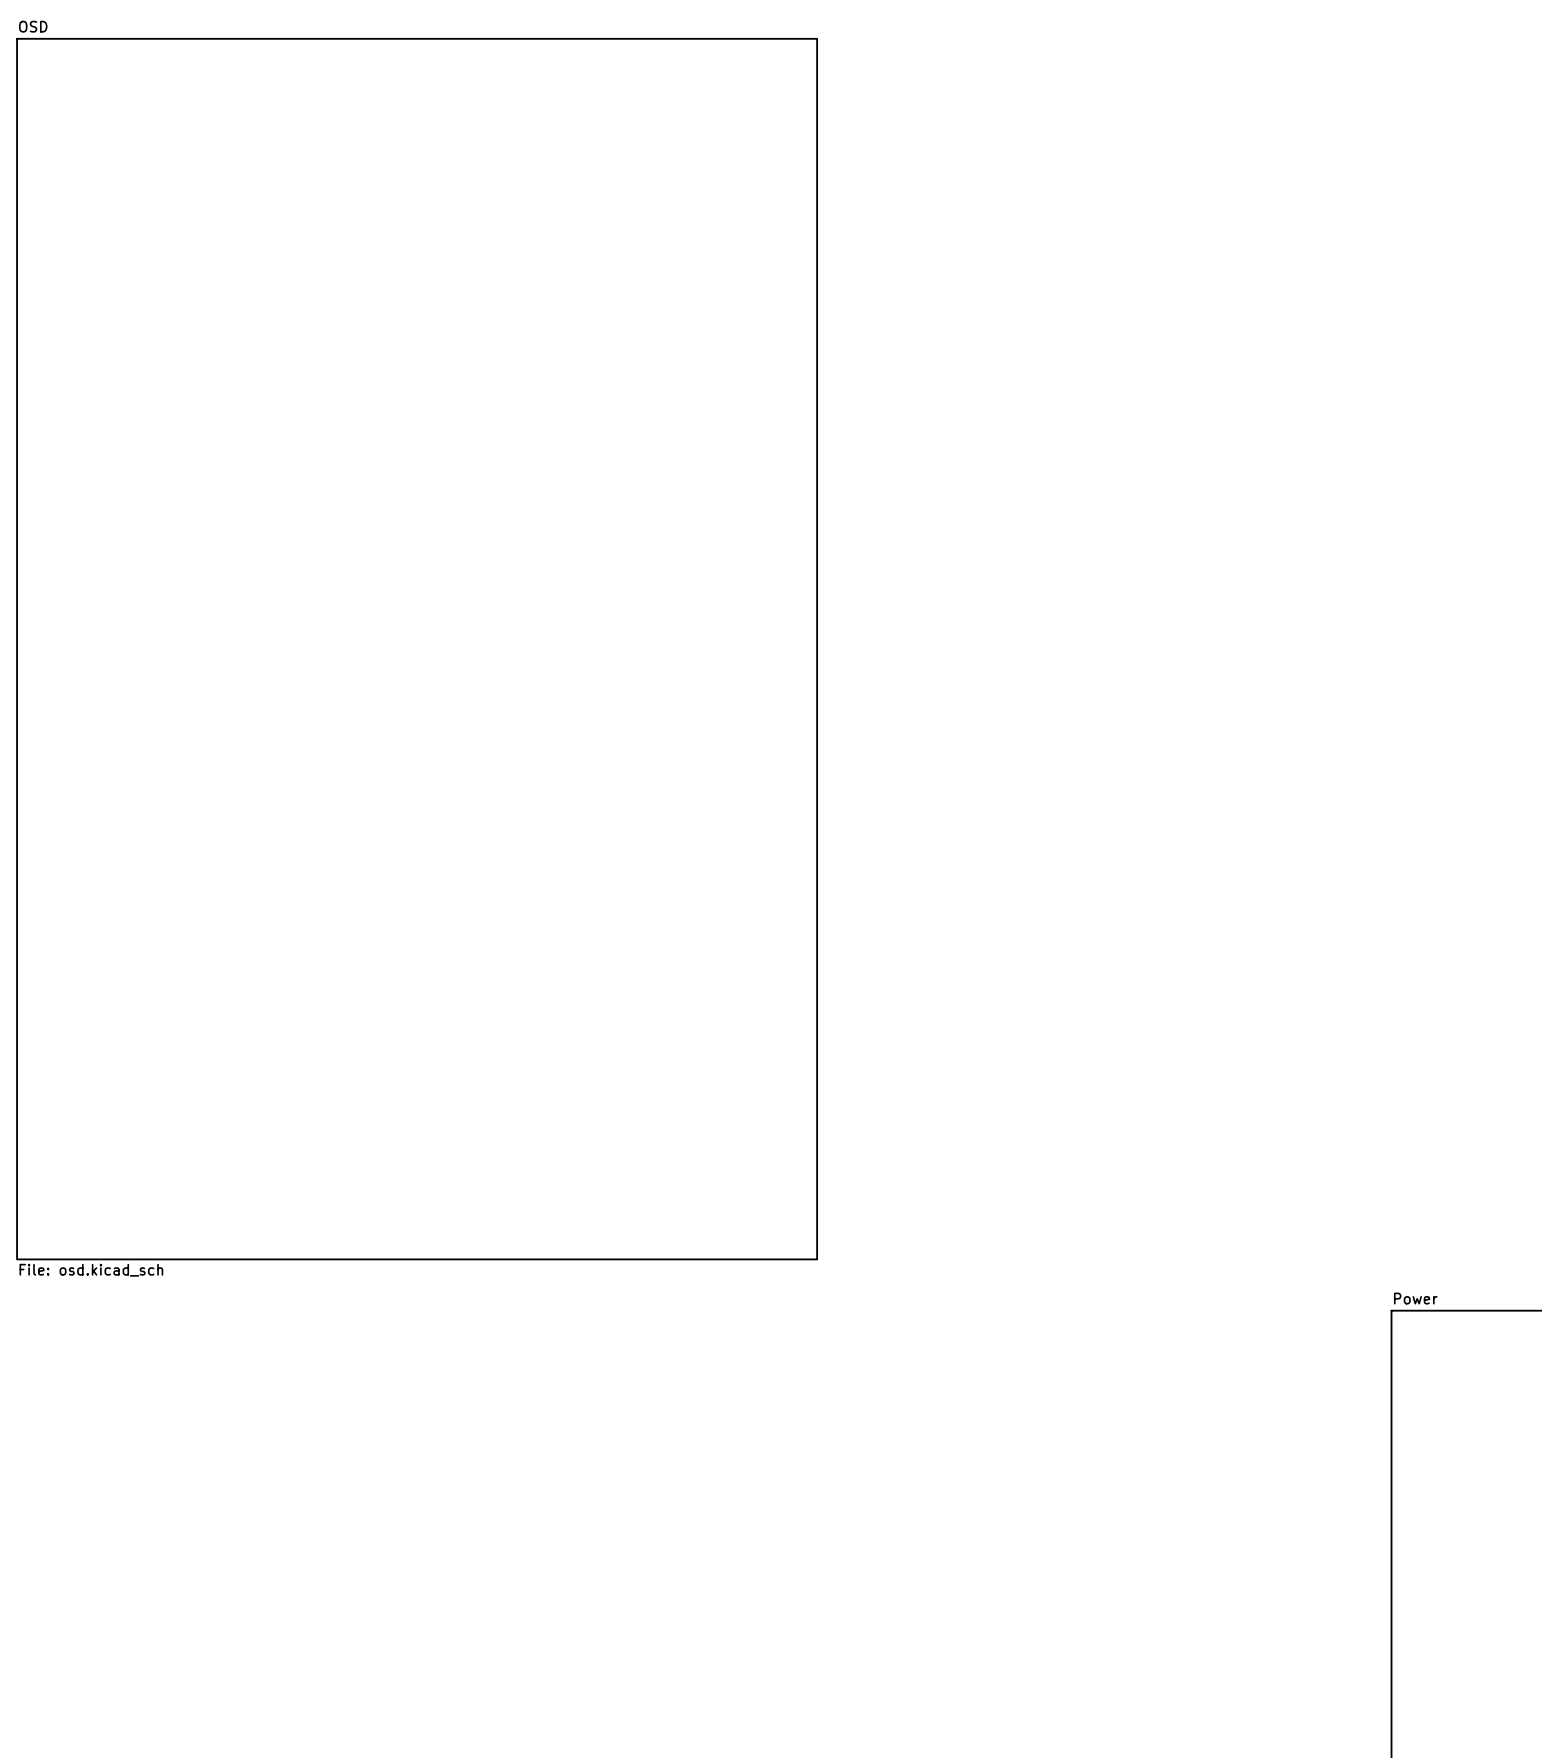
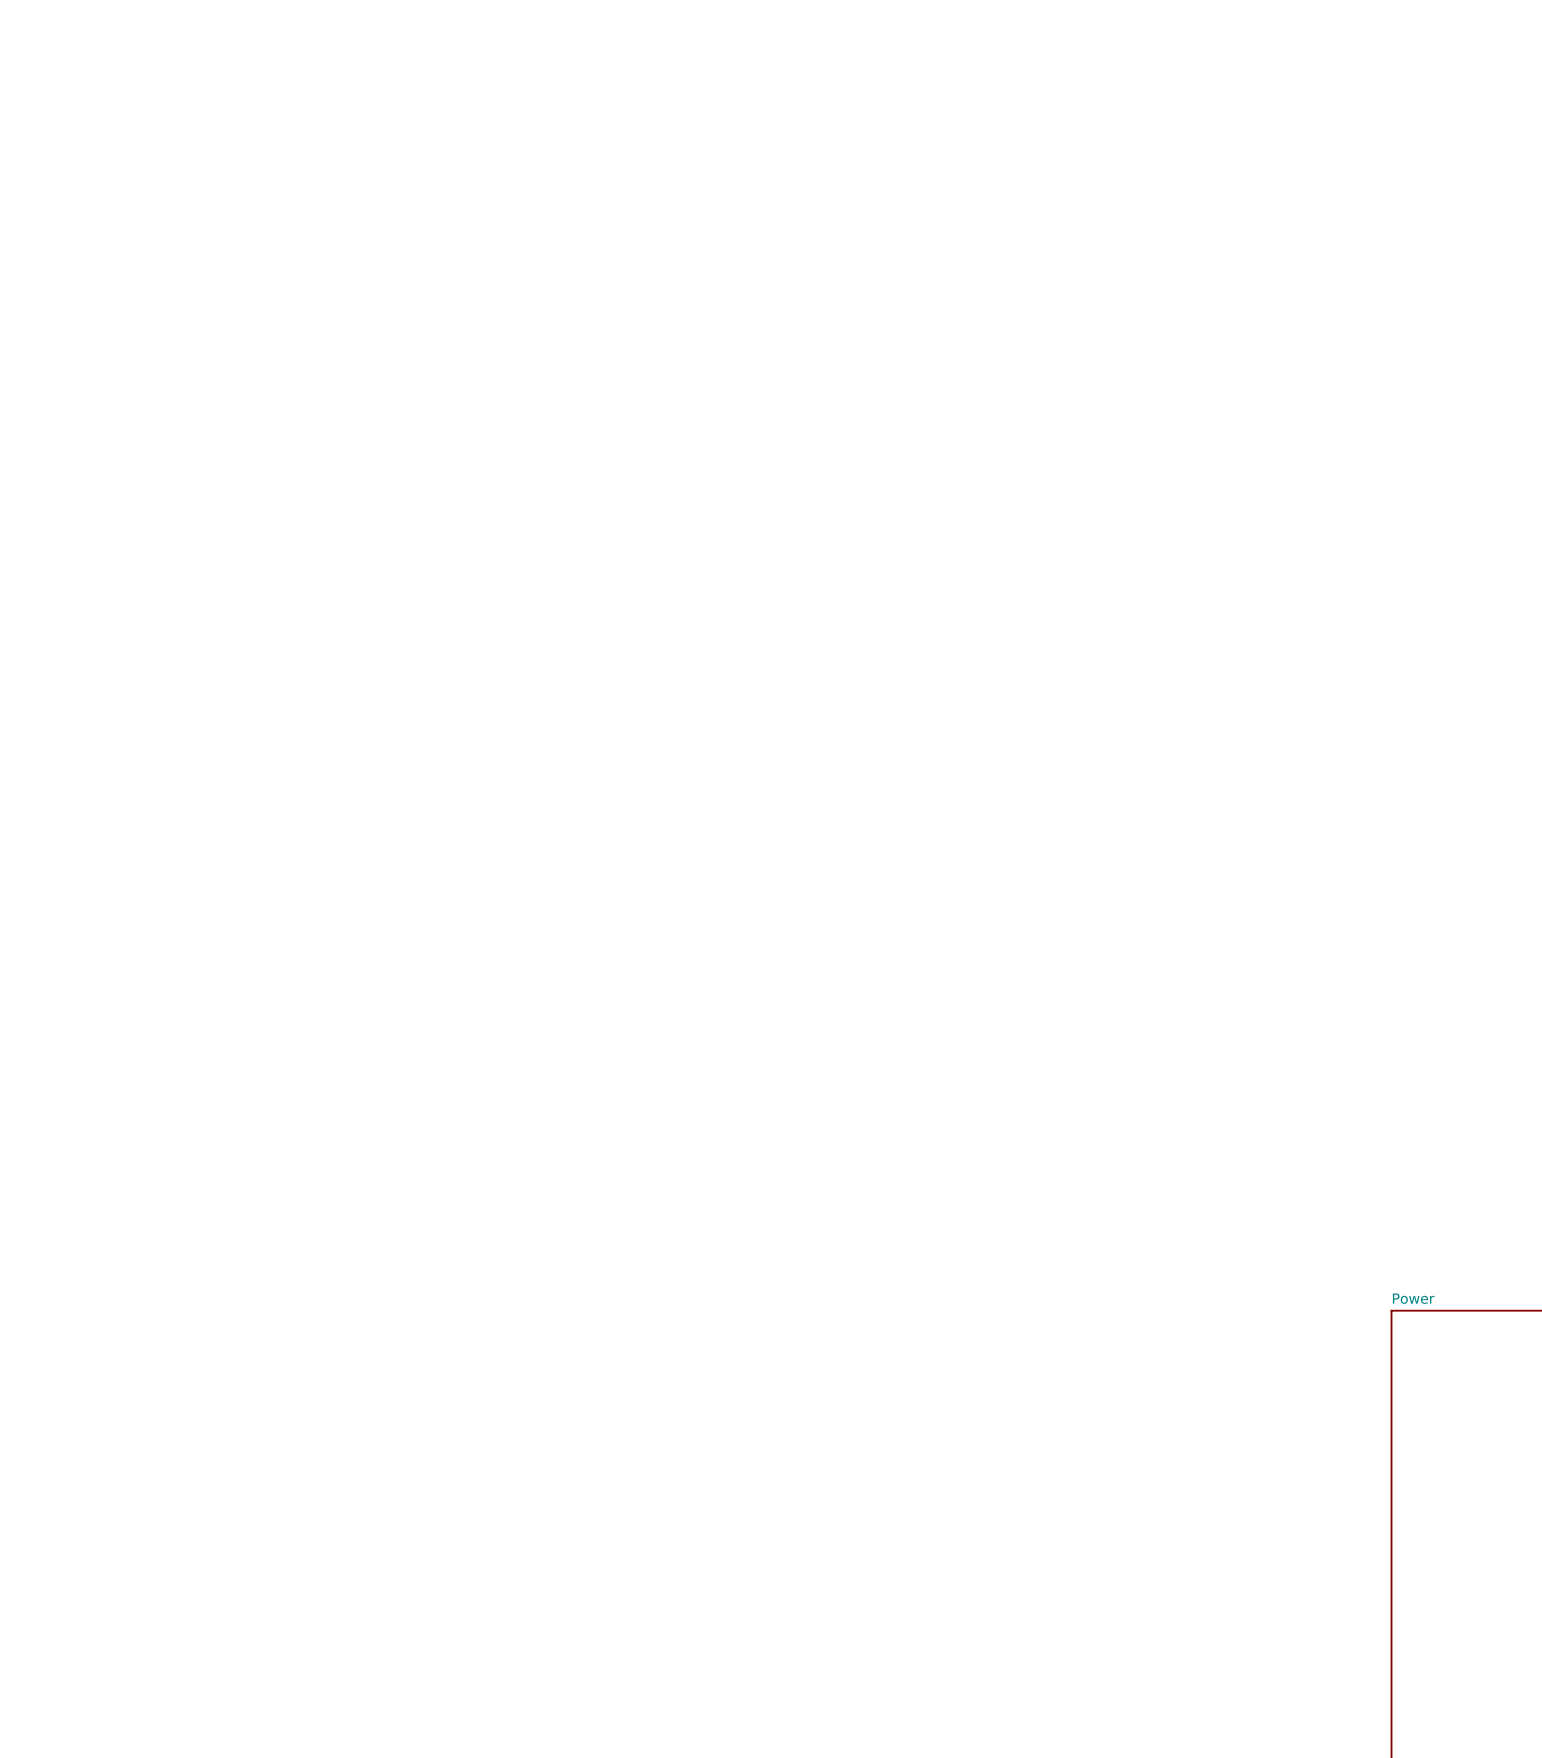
sheet OSD: File: osd.kicad_sch (417, 649) -> none

